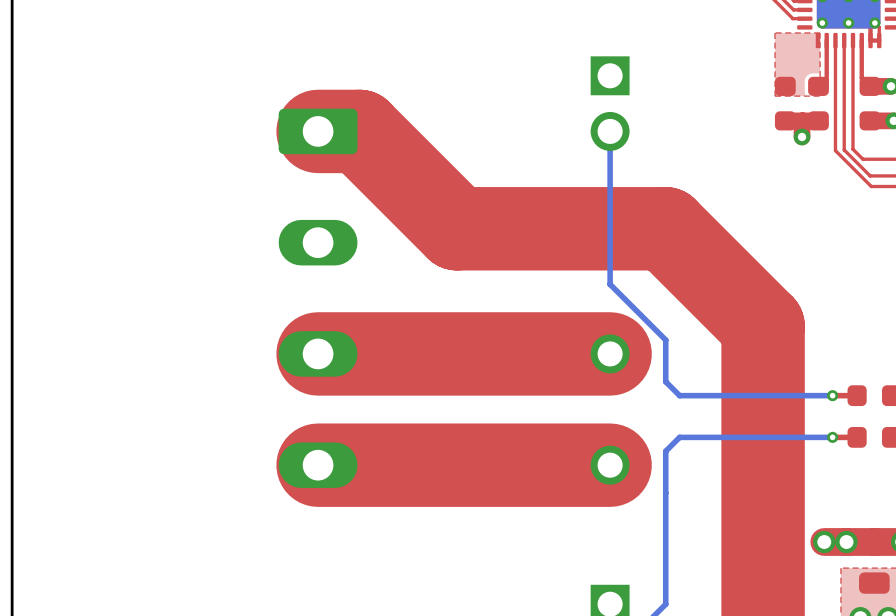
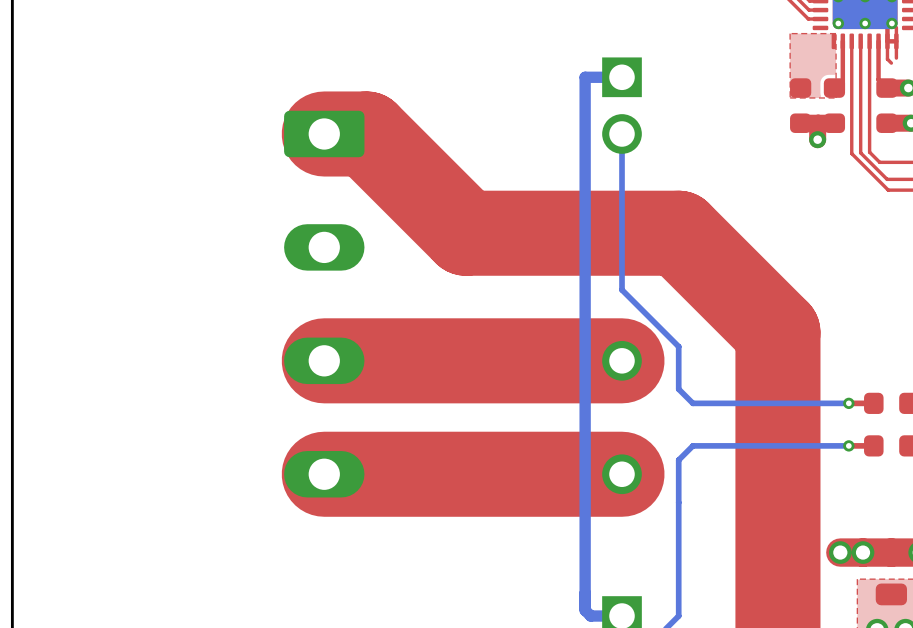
top track: none -> (887, 41) (887, 59) (891, 63)
top track: none -> (896, 41) (896, 58)
bottom track: none -> (622, 77) (585, 77) (585, 610) (590, 616) (622, 616)

